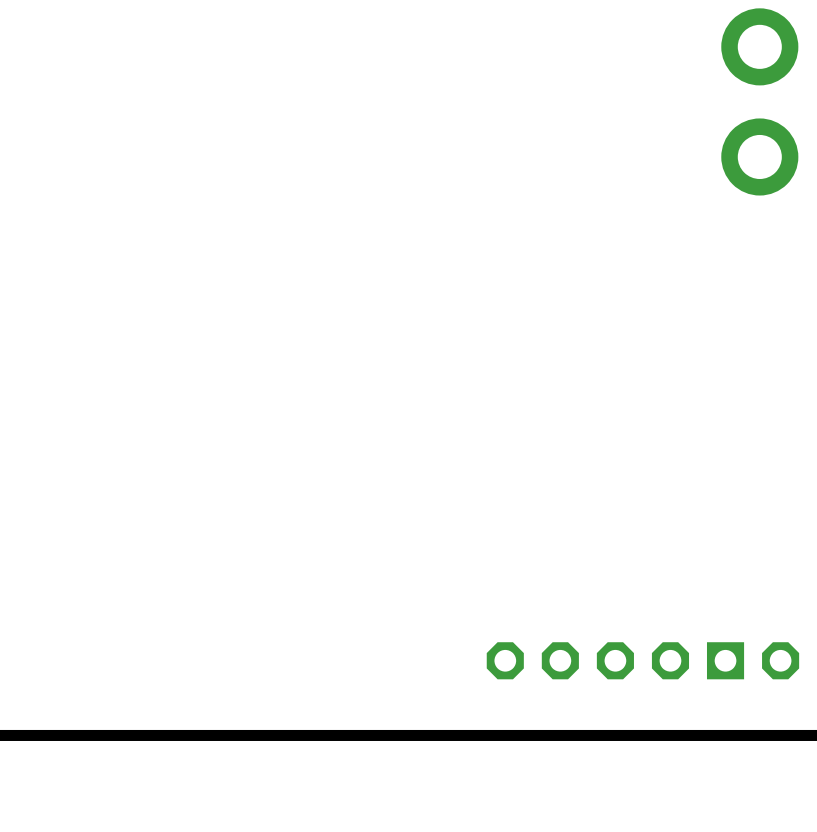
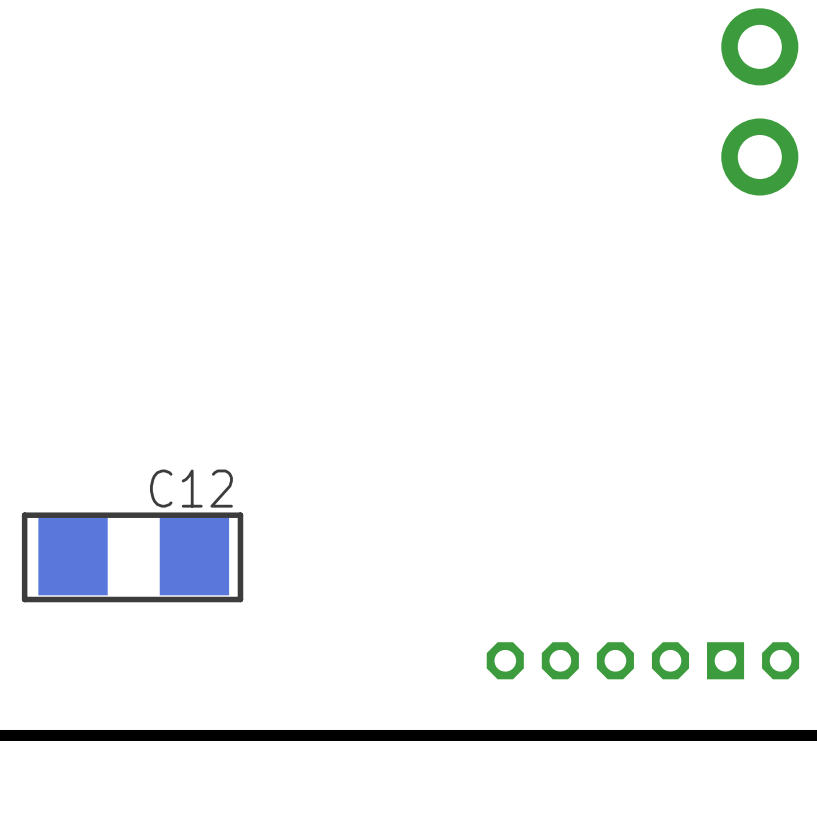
line: none -> (240, 515) (240, 599) (24, 599) (24, 515) (240, 515)
C12: none -> (133, 556)

